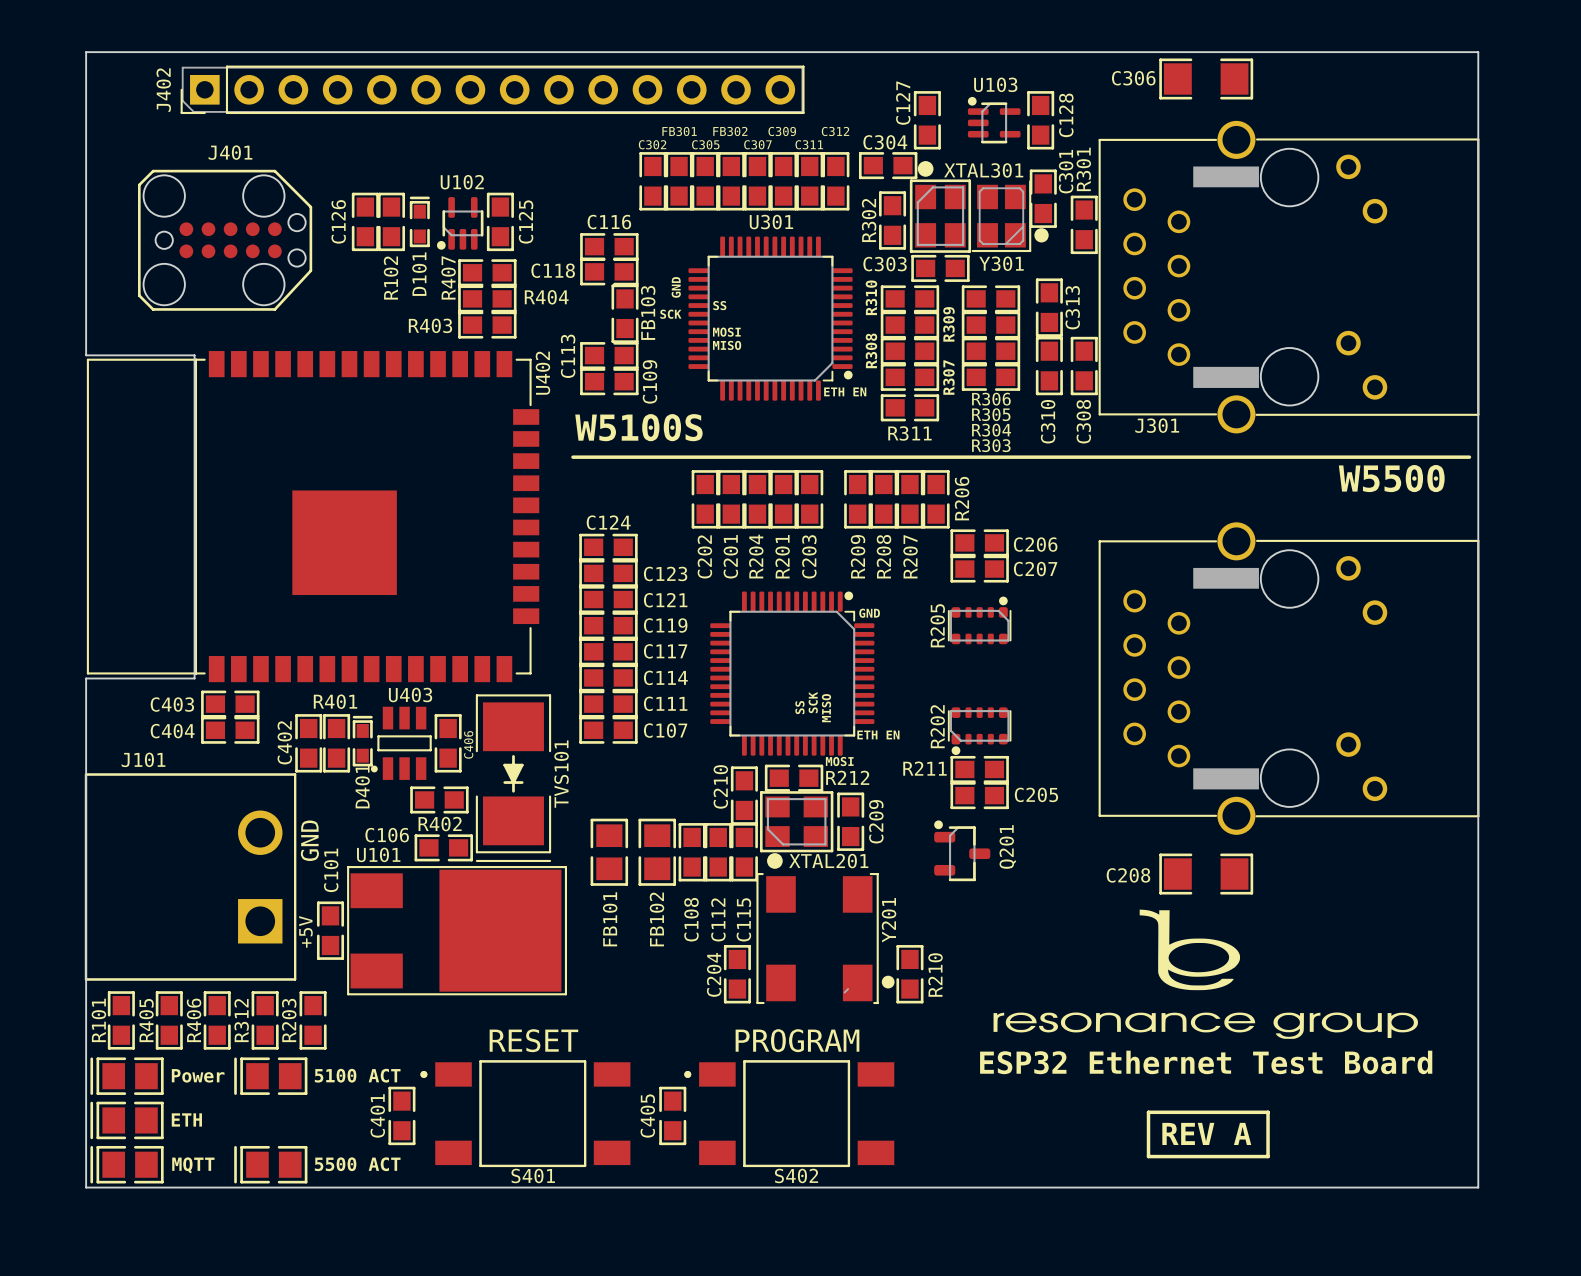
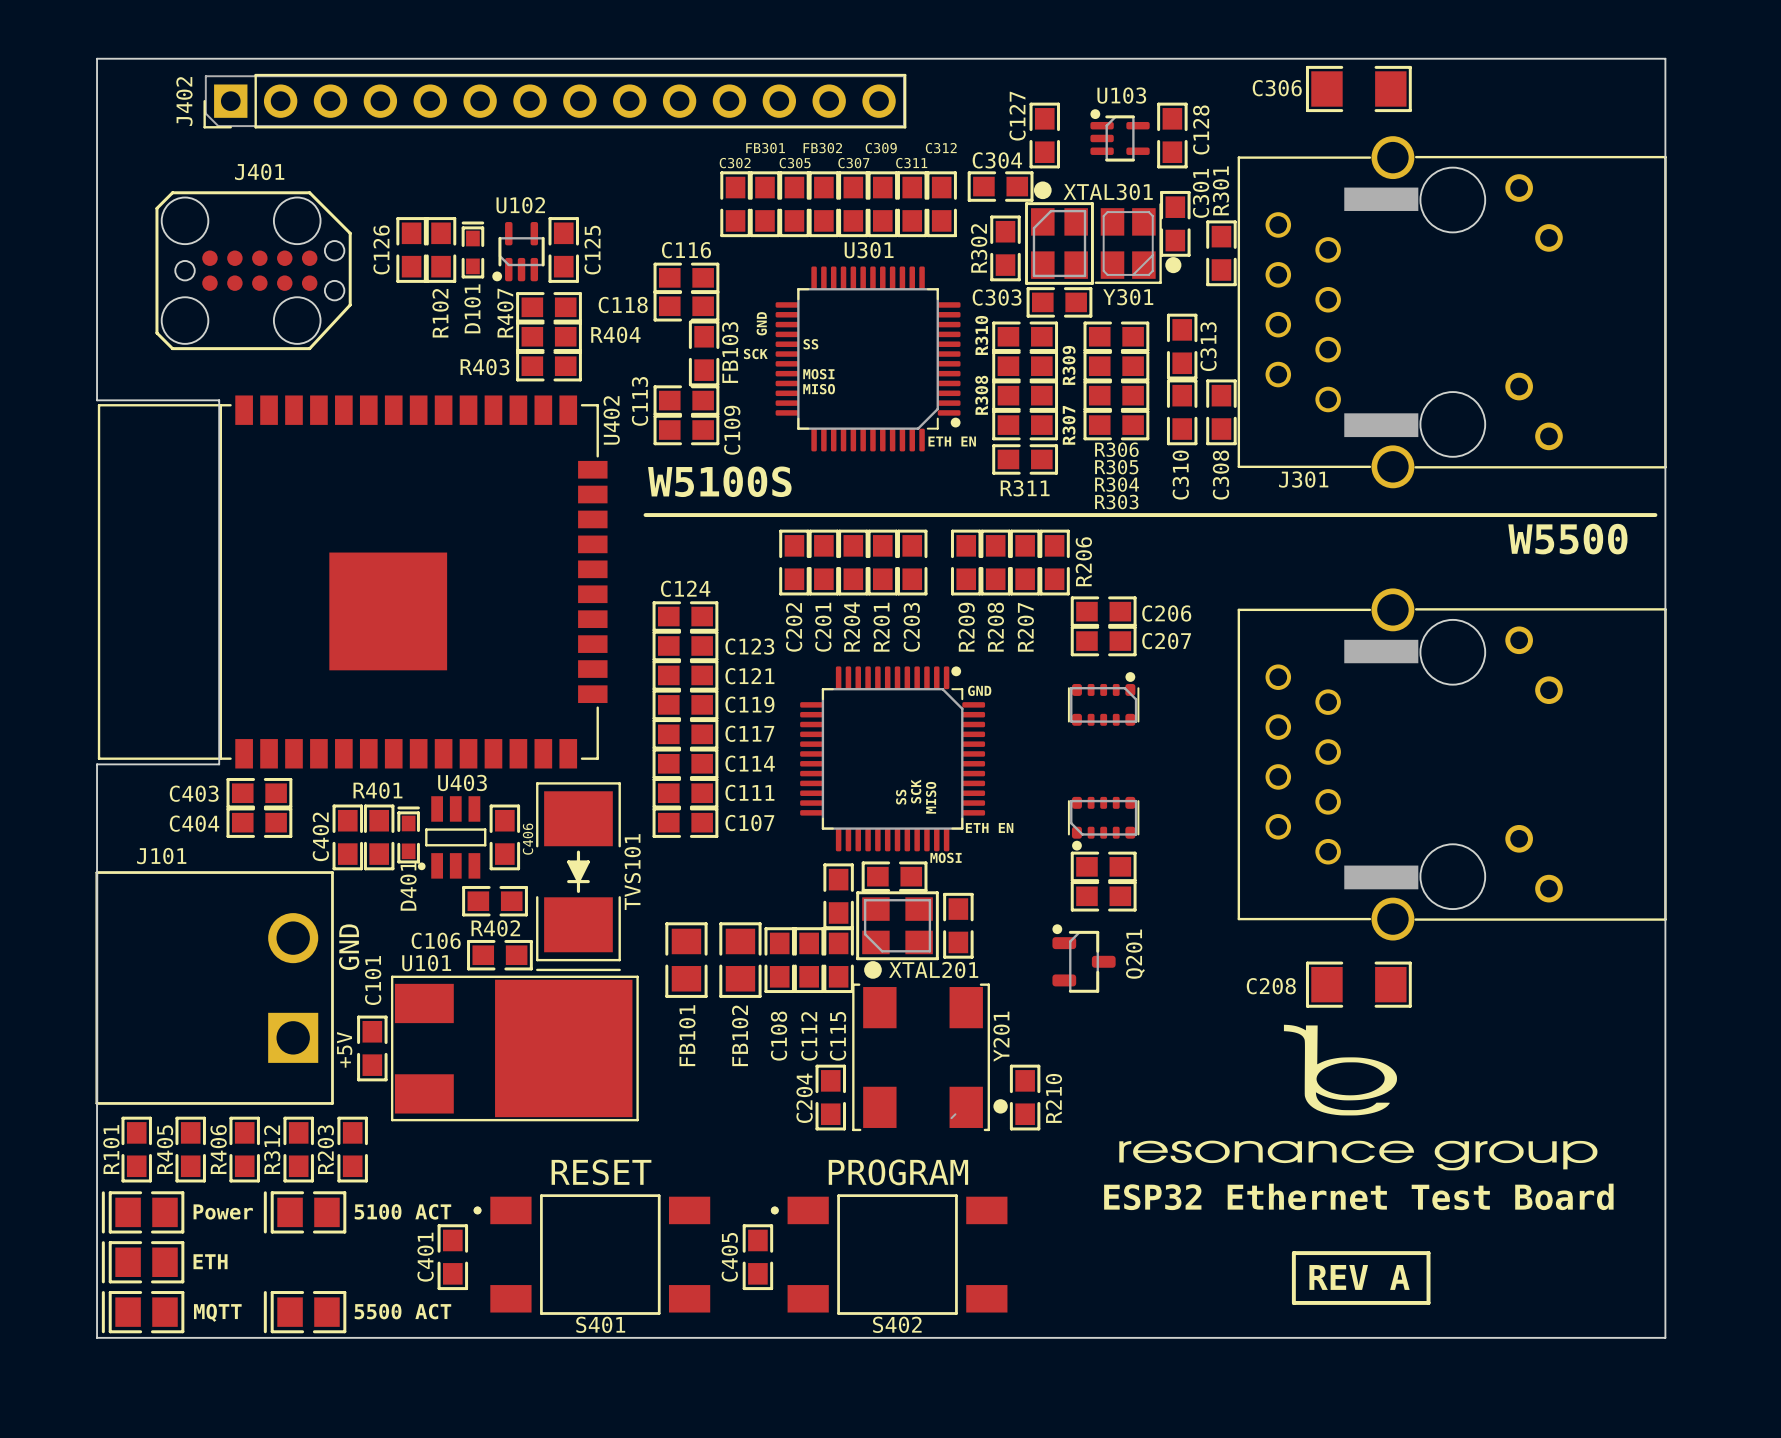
R205 name: R205 (937, 625) -> none
R202 name: R202 (937, 726) -> none
R211 name: R211 (924, 768) -> none
R212 name: R212 (847, 777) -> none
C210 name: C210 (720, 786) -> none
C205 name: C205 (1036, 794) -> none
C209 name: C209 (876, 821) -> none

